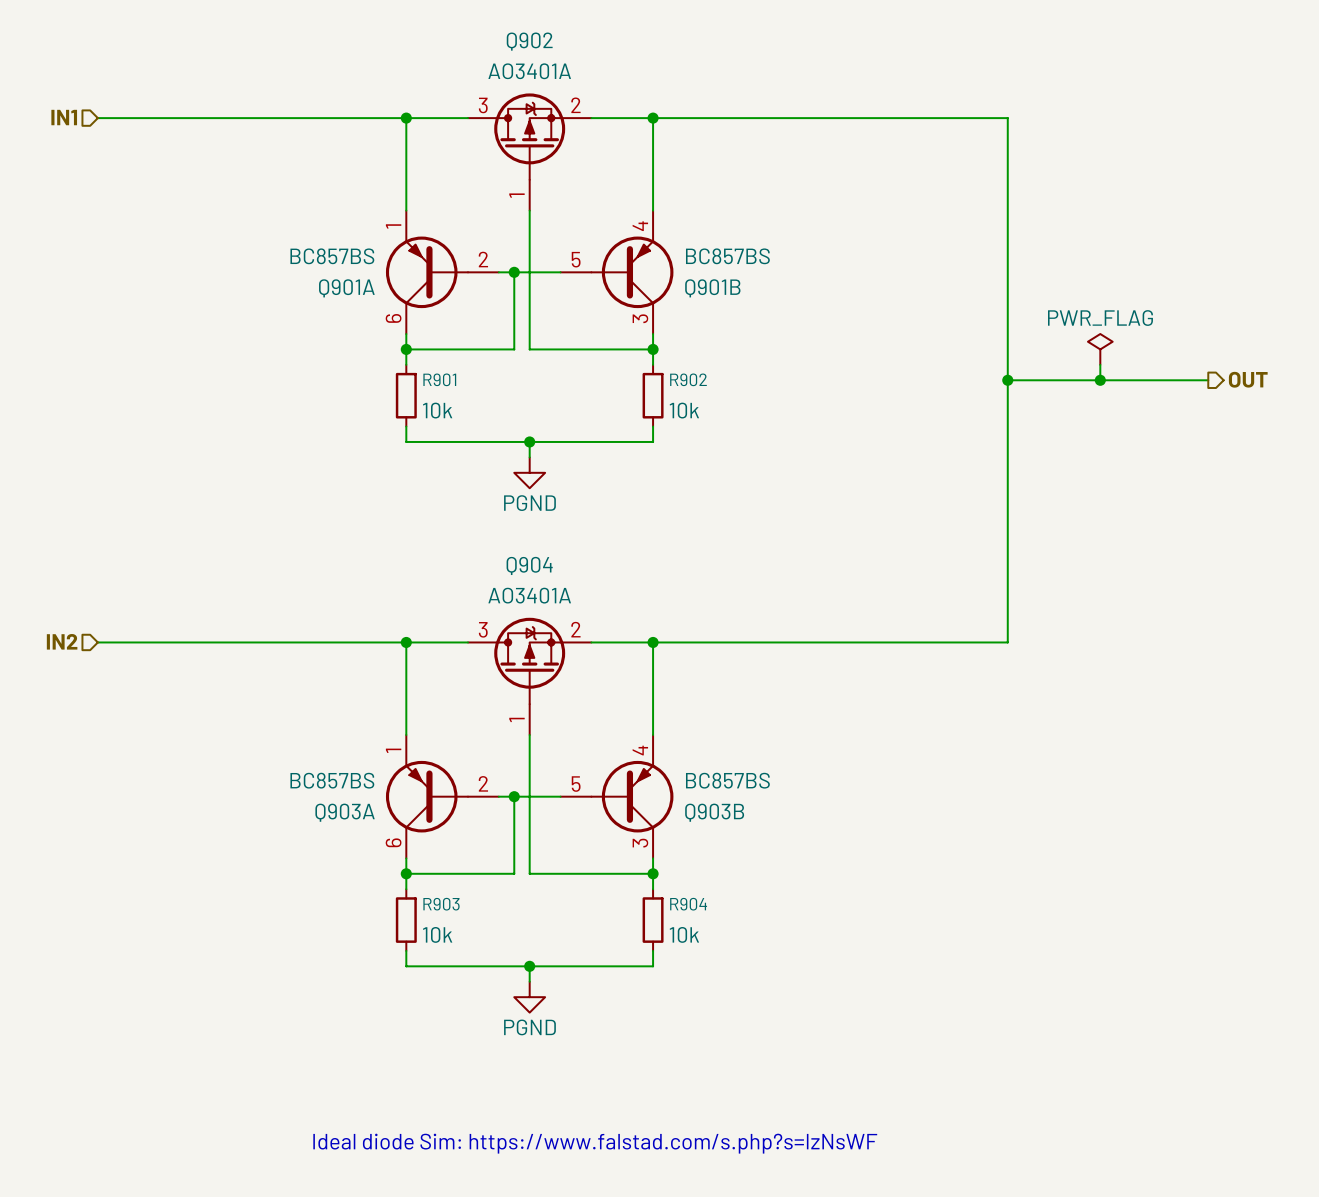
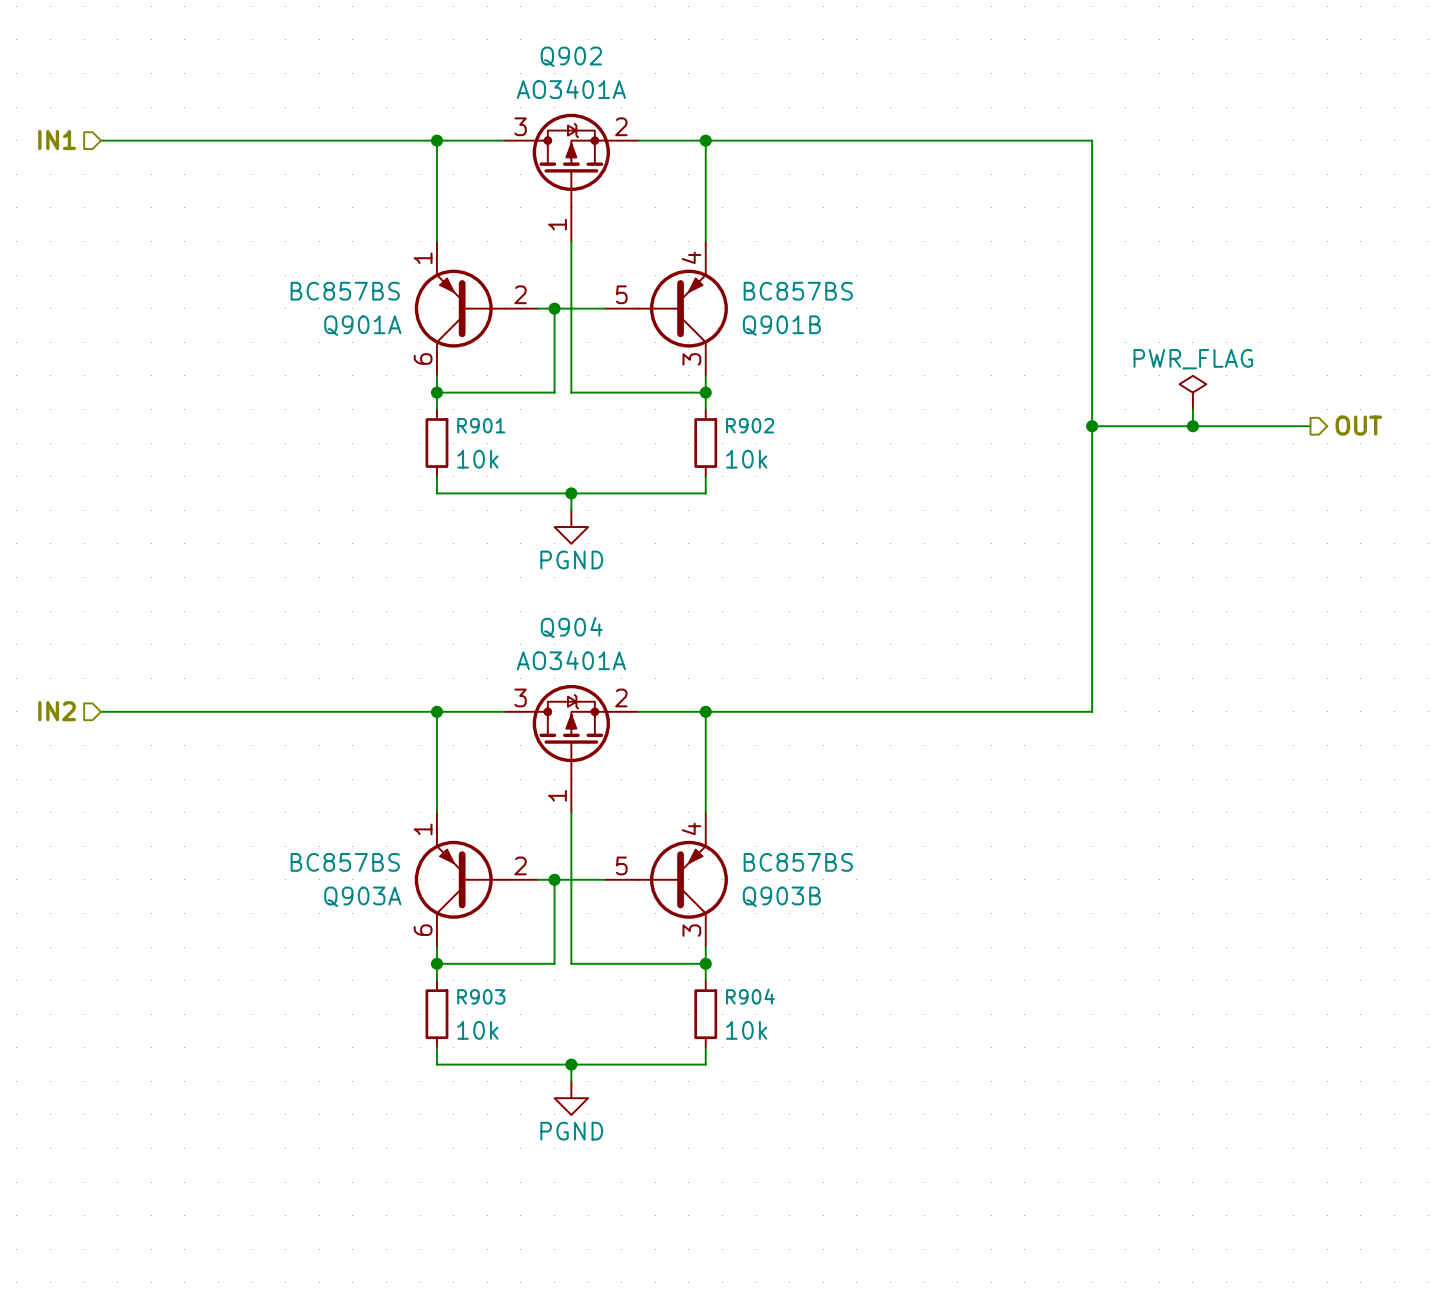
text: Ideal diode Sim: https://www.falstad.com/s.php?s=IzNsWF (595, 1143) -> none

